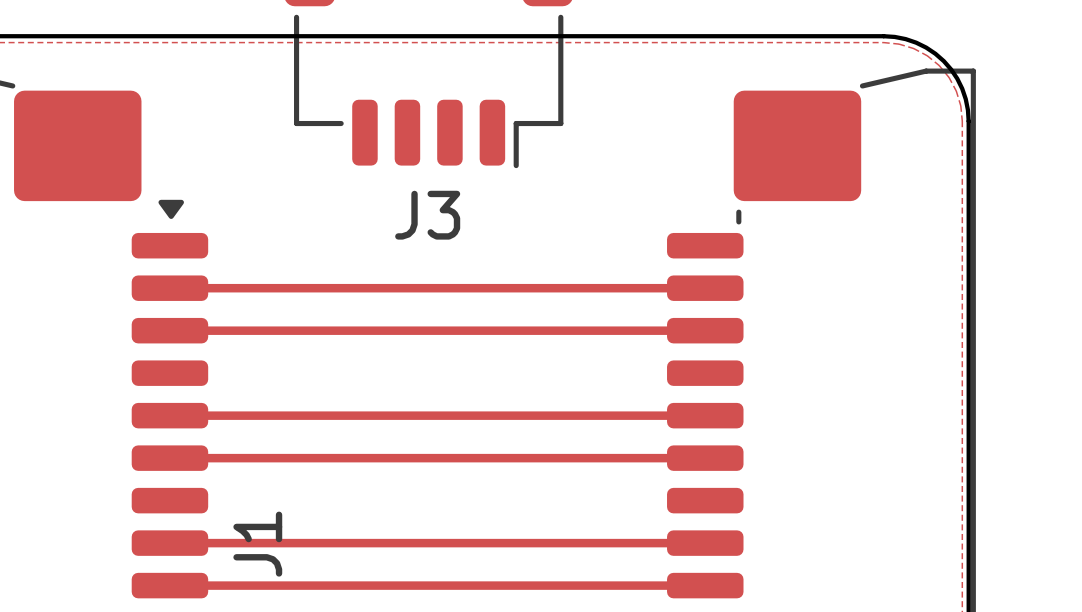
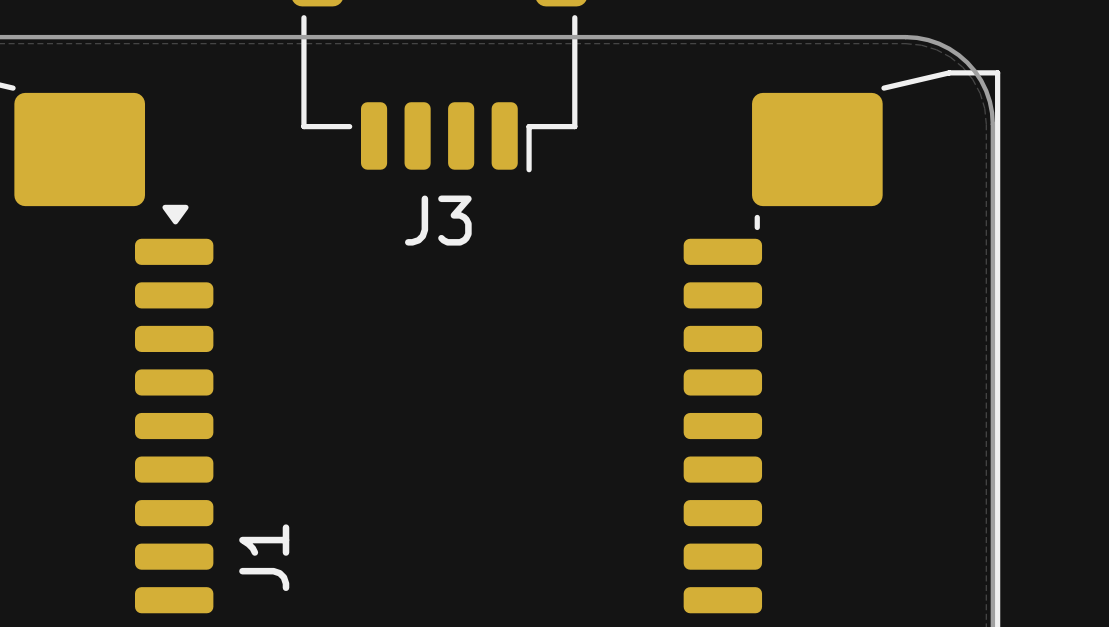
track: (169, 288) (705, 288) -> none
track: (169, 330) (705, 330) -> none
track: (169, 415) (705, 415) -> none
track: (169, 458) (705, 458) -> none
track: (169, 543) (705, 543) -> none
track: (169, 585) (705, 585) -> none

